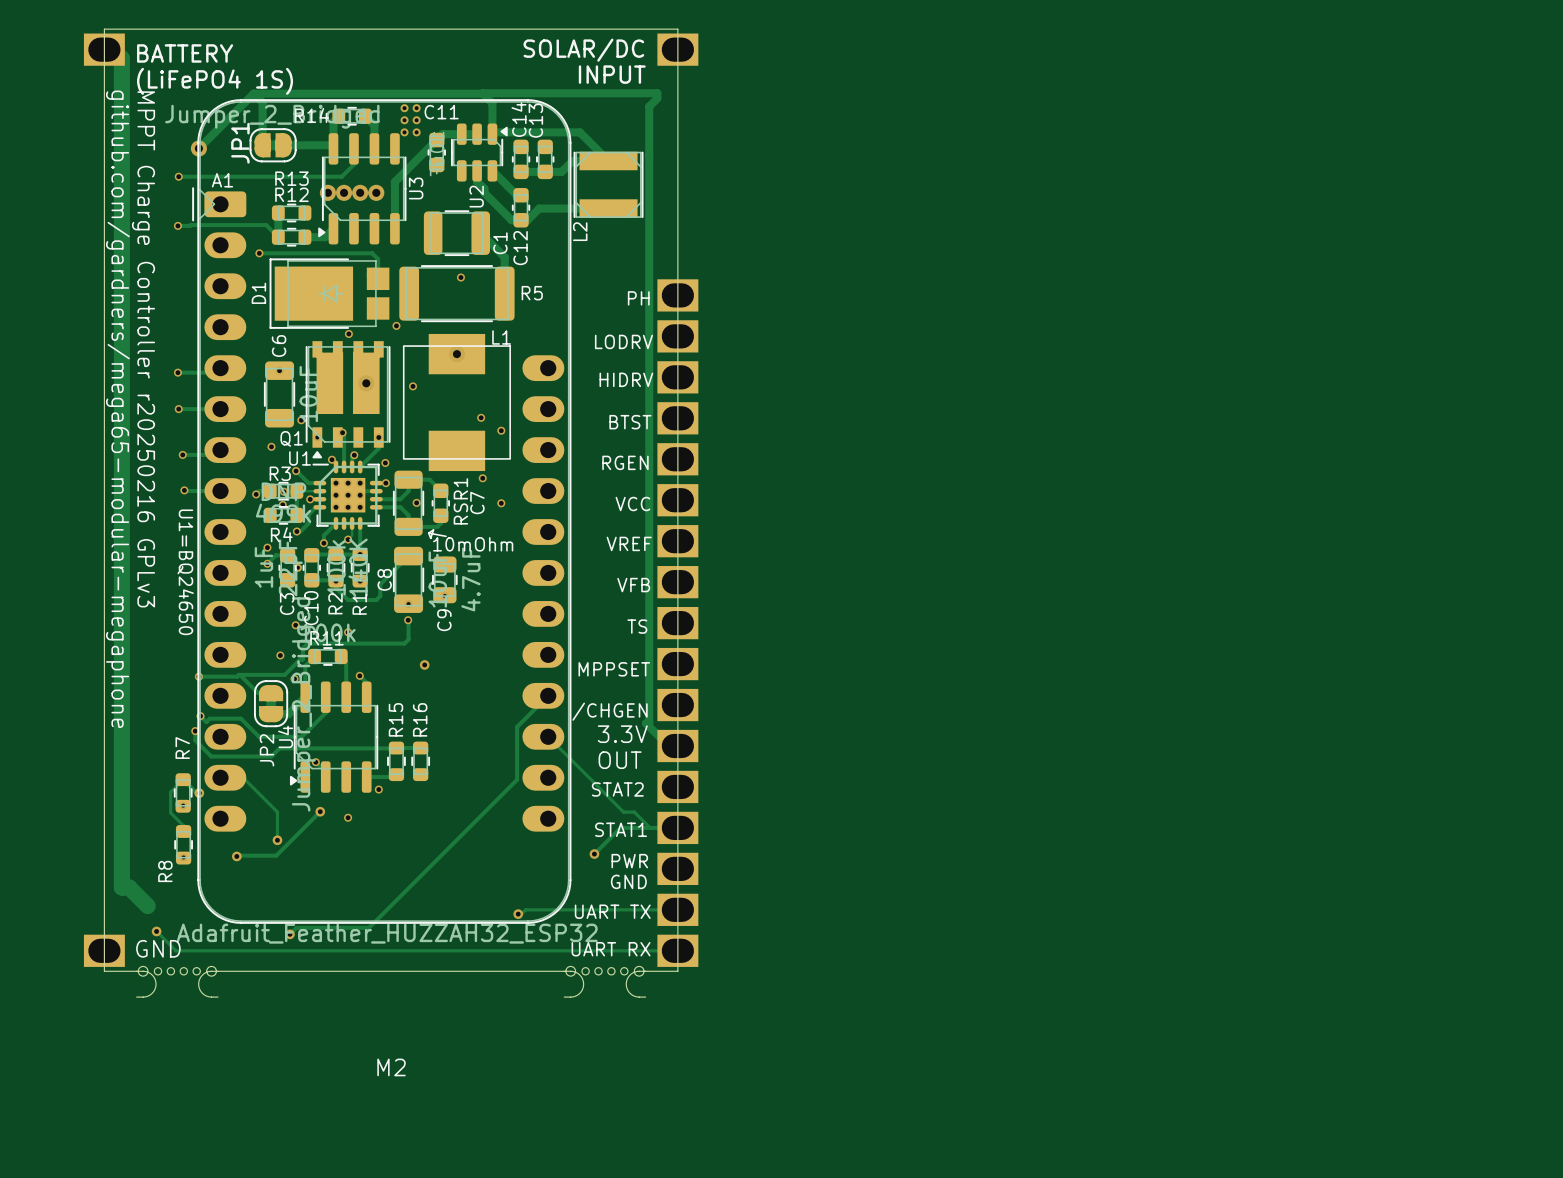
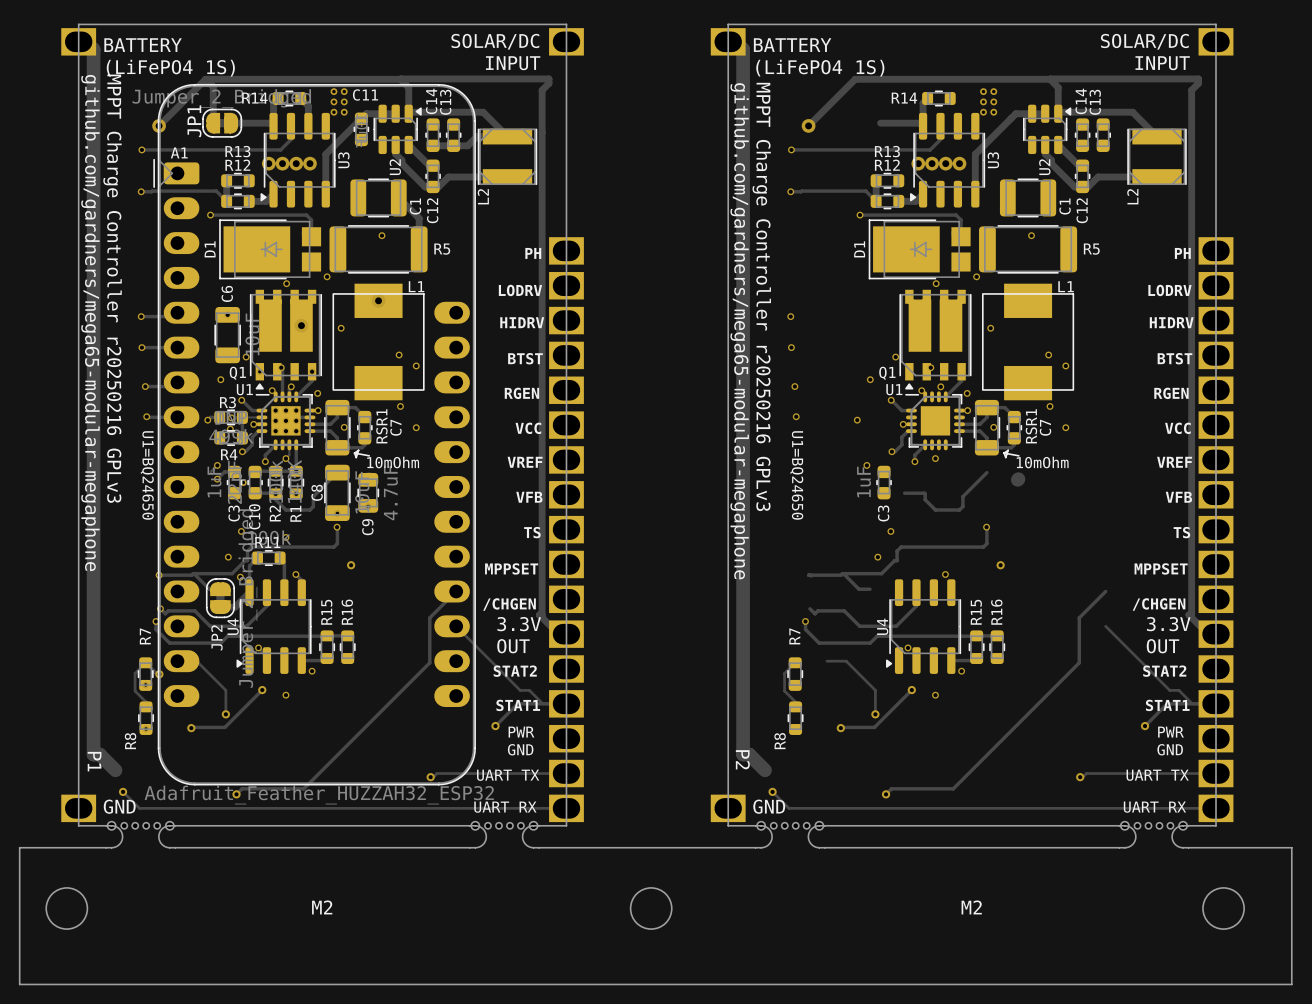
M2 footprint: [83, 28, 699, 998] -> [61, 24, 584, 849]
track: none -> (728, 41) (735, 41) (743, 49) (743, 754) (749, 754) (765, 770)
text: none -> SOLAR/DC (1144, 41)
text: none -> BATTERY (792, 45)
text: none -> INPUT (1162, 63)
text: none -> (LiFePO4 1S) (820, 68)
track: none -> (1050, 79) (1198, 78) (1198, 83) (1191, 90) (1191, 614) (1188, 614) (1208, 634) (1216, 634)
track: none -> (1050, 79) (1058, 87) (1058, 113) (1059, 112) (1132, 112) (1157, 136) (1161, 132)
track: none -> (1050, 79) (855, 79) (808, 126)
via: none -> (983, 91)
via: none -> (993, 91)
track: none -> (927, 98) (923, 103) (923, 126) (919, 123) (880, 123)
R14: none -> (938, 98)
via: none -> (983, 101)
via: none -> (993, 101)
via: none -> (983, 112)
via: none -> (993, 112)
track: none -> (1045, 113) (1015, 113) (975, 154) (975, 194)
via: none -> (808, 125)
track: none -> (940, 126) (940, 139) (930, 149) (791, 149)
U2: none -> (1047, 129)
C14: none -> (1082, 135)
C13: none -> (1103, 135)
track: none -> (1045, 144) (1045, 154) (1051, 160) (1051, 163) (1074, 186) (1088, 186) (1098, 177) (1157, 177)
track: none -> (1058, 144) (1079, 165) (1082, 165)
via: none -> (791, 149)
L2: none -> (1157, 156)
U3: none -> (947, 160)
via: none -> (918, 163)
via: none -> (932, 163)
via: none -> (945, 163)
via: none -> (959, 163)
C12: none -> (1082, 176)
track: none -> (876, 180) (876, 201) (865, 191) (790, 191)
R13: none -> (887, 180)
via: none -> (790, 191)
track: none -> (923, 194) (915, 201) (898, 201)
C1: none -> (1028, 197)
R12: none -> (887, 201)
track: none -> (860, 215) (956, 215) (961, 220) (961, 236) (957, 233)
via: none -> (860, 215)
via: none -> (1031, 235)
D1: none -> (919, 249)
R5: none -> (1028, 249)
text: none -> PH (1182, 253)
via: none -> (976, 276)
via: none -> (936, 283)
text: none -> LODRV (1169, 290)
text: none -> MPPT Charge Controller r20250216 GPLv3 (761, 296)
via: none -> (790, 316)
text: none -> HIDRV (1171, 322)
via: none -> (990, 328)
Q1: none -> (935, 339)
L1: none -> (1028, 341)
via: none -> (791, 347)
via: none -> (1048, 355)
text: none -> github.com/gardners/mega65-modular-megaphone (739, 331)
via: none -> (895, 357)
text: none -> BTST (1174, 358)
via: none -> (1065, 365)
via: none -> (930, 367)
track: none -> (961, 371) (961, 381) (945, 396)
via: none -> (870, 379)
via: none -> (794, 386)
via: none -> (940, 386)
via: none -> (921, 390)
via: none -> (967, 393)
text: none -> RGEN (1171, 393)
track: none -> (891, 400) (901, 410) (911, 410)
via: none -> (891, 400)
via: none -> (1050, 406)
via: none -> (967, 410)
via: none -> (796, 416)
track: none -> (1014, 417) (1004, 407) (986, 407) (986, 417) (980, 424) (959, 424)
via: none -> (857, 420)
U1: none -> (935, 420)
via: none -> (903, 424)
via: none -> (993, 427)
RSR1: none -> 10mOhm (986, 427)
C7: none -> (1014, 427)
via: none -> (1065, 427)
text: none -> VCC (1177, 428)
track: none -> (911, 431) (908, 431) (901, 437) (901, 444) (894, 451) (891, 451)
track: none -> (959, 431) (980, 431) (986, 437) (986, 447) (1011, 447) (1014, 444) (1014, 438)
M2: none -> (972, 436)
track: none -> (925, 444) (914, 455) (914, 461)
via: none -> (891, 451)
line: none -> (1004, 453) (1005, 457) (1008, 450) (1004, 453)
line: none -> (1004, 453) (1018, 455)
via: none -> (935, 458)
via: none -> (914, 461)
text: none -> VREF (1174, 462)
via: none -> (866, 465)
track: none -> (986, 472) (962, 496) (962, 506) (959, 510) (935, 510) (925, 499) (924, 493) (904, 493)
track: none -> (1018, 479) (1017, 479)
C3: none -> 1uF (884, 482)
text: none -> U1=BQ24650 (796, 475)
text: none -> VFB (1178, 497)
track: none -> (986, 527) (986, 543) (983, 547) (901, 547) (897, 551) (897, 560) (894, 560) (881, 573) (808, 575)
via: none -> (986, 527)
via: none -> (890, 531)
text: none -> TS (1181, 532)
via: none -> (877, 557)
via: none -> (1000, 565)
text: none -> MPPSET (1161, 568)
track: none -> (843, 573) (859, 589) (869, 589)
via: none -> (945, 574)
track: none -> (1105, 591) (1079, 617) (1079, 662) (953, 788) (891, 788) (886, 794)
track: none -> (916, 592) (916, 606) (896, 626) (859, 626) (844, 610) (817, 610) (814, 613) (809, 608)
text: none -> /CHGEN (1159, 604)
track: none -> (805, 621) (805, 629) (819, 643) (870, 643) (877, 636) (997, 635)
via: none -> (805, 621)
text: none -> 3.3V (1168, 624)
track: none -> (1105, 626) (1169, 690) (1178, 690) (1192, 703) (1216, 703) (1167, 703) (1145, 726)
U4: none -> (923, 626)
text: none -> OUT (1163, 646)
R15: none -> (976, 647)
R16: none -> (997, 647)
via: none -> (908, 647)
track: none -> (976, 658) (974, 660) (951, 660)
track: none -> (826, 661) (846, 661) (875, 690) (875, 714)
track: none -> (794, 662) (784, 673) (784, 691) (795, 702) (795, 706)
via: none -> (961, 671)
text: none -> STAT2 (1164, 671)
R7: none -> (795, 674)
track: none -> (911, 690) (874, 727) (840, 728)
via: none -> (911, 690)
via: none -> (935, 695)
text: none -> STAT1 (1167, 705)
via: none -> (875, 714)
R8: none -> (795, 718)
via: none -> (1145, 726)
via: none -> (840, 728)
text: none -> PWR (1170, 732)
text: none -> GND (1170, 749)
text: none -> P2 (742, 759)
text: none -> P1 (94, 761)
track: none -> (1216, 773) (1086, 773) (1080, 777)
text: none -> UART TX (1157, 775)
via: none -> (1080, 777)
track: none -> (772, 791) (789, 808) (1216, 808)
via: none -> (772, 791)
via: none -> (886, 794)
text: none -> GND (769, 806)
text: none -> UART RX (1154, 807)
board edge: none -> (106, 847) (19, 847) (19, 984) (1291, 984) (1291, 847) (1188, 847)
board edge: none -> (175, 847) (469, 847)
board edge: none -> (539, 847) (755, 847)
board edge: none -> (824, 847) (1119, 847)
round board edge: none -> [45, 887, 88, 930]
round board edge: none -> [630, 887, 673, 930]
round board edge: none -> [1202, 887, 1245, 930]

